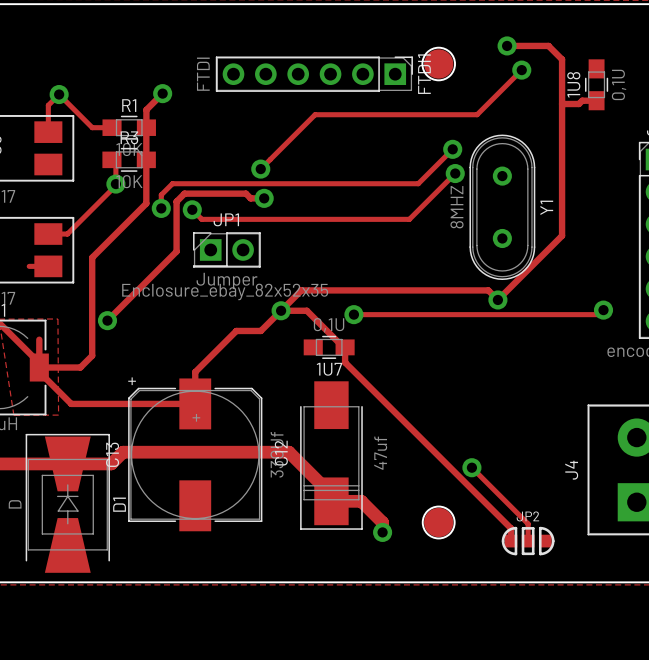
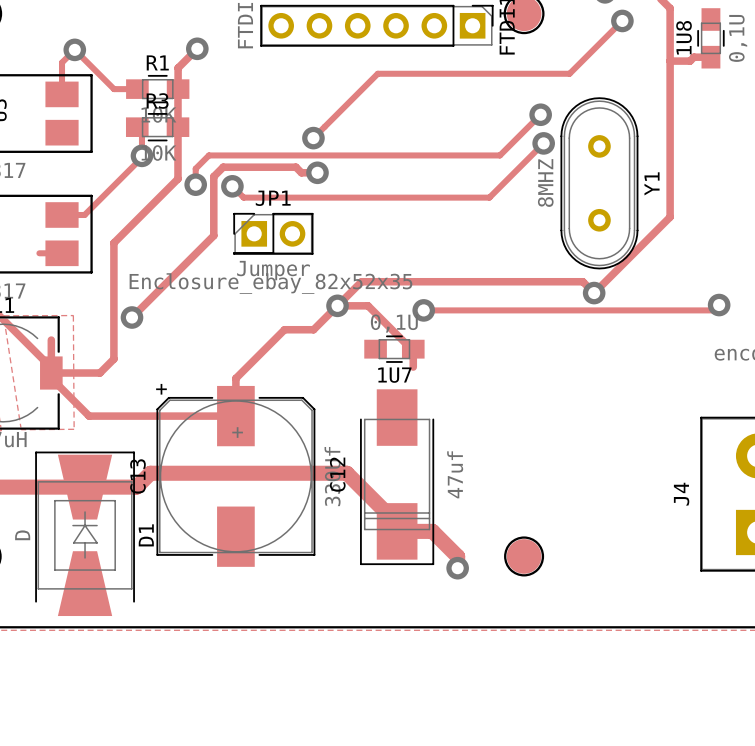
track: (345, 362) (510, 528) (510, 541) -> none
track: (471, 467) (528, 523) (528, 541) -> none
via: (471, 467) -> none
JP2: (528, 541) -> none

